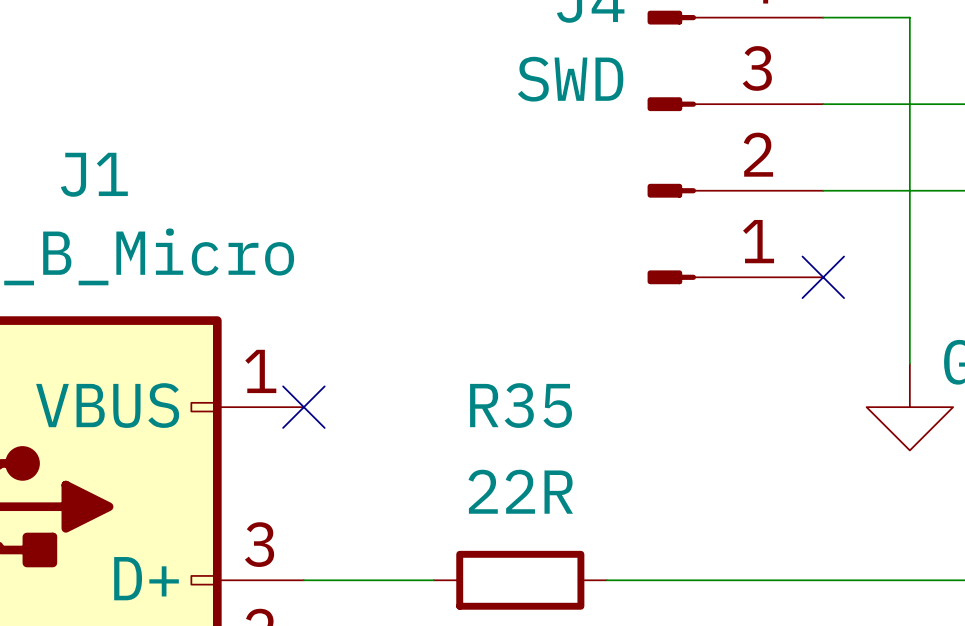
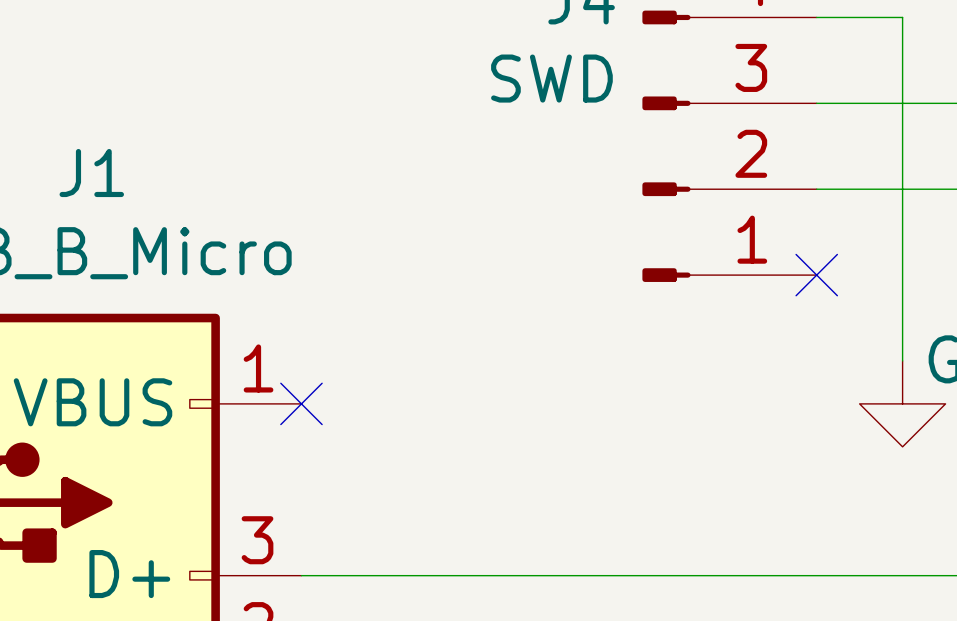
wire: none -> (430, 575) (602, 575)
R35: 22R (520, 580) -> none

